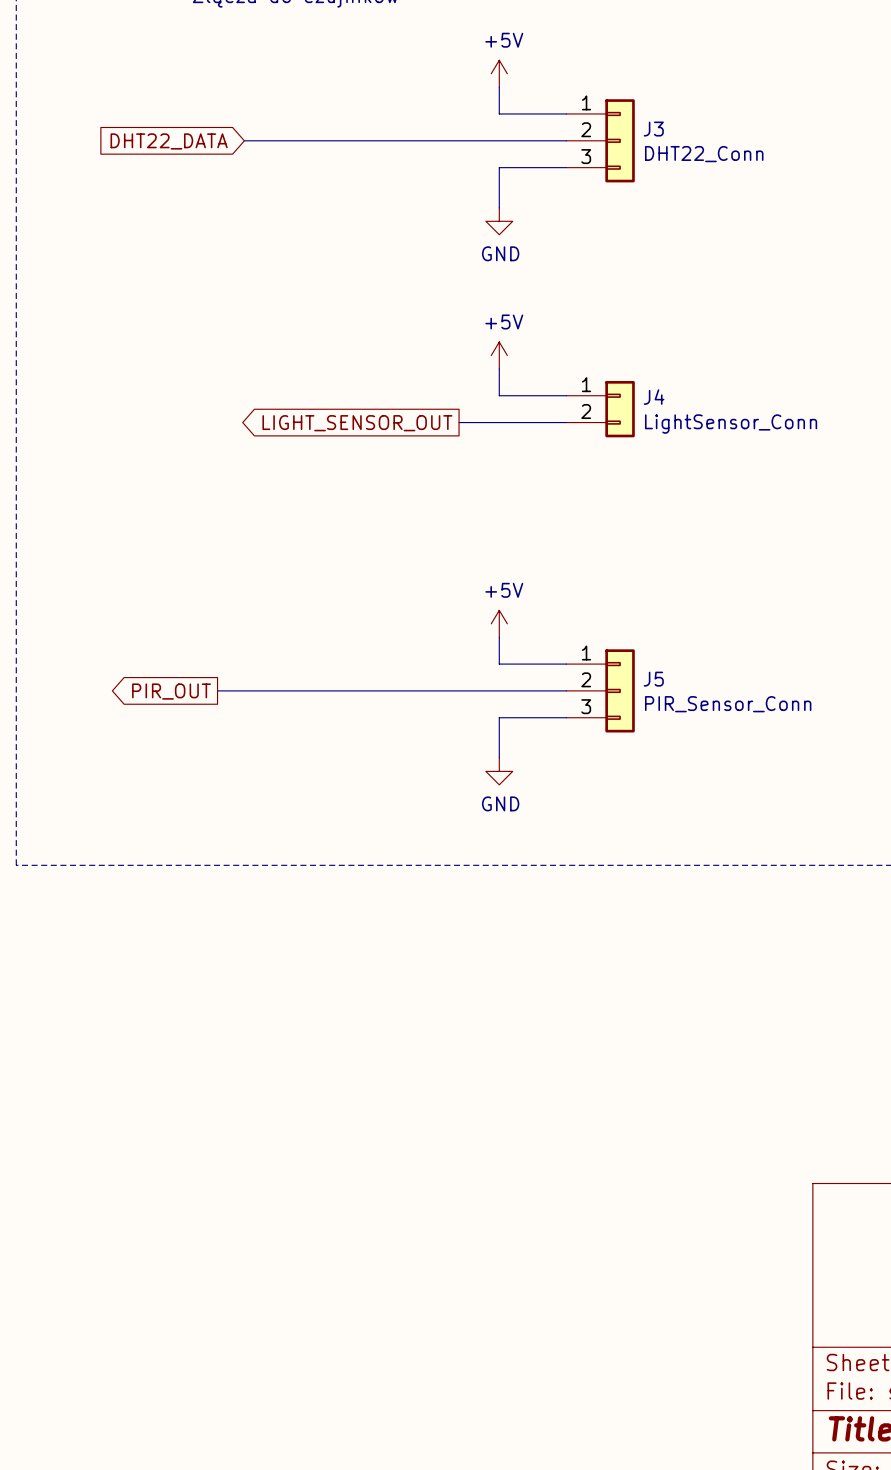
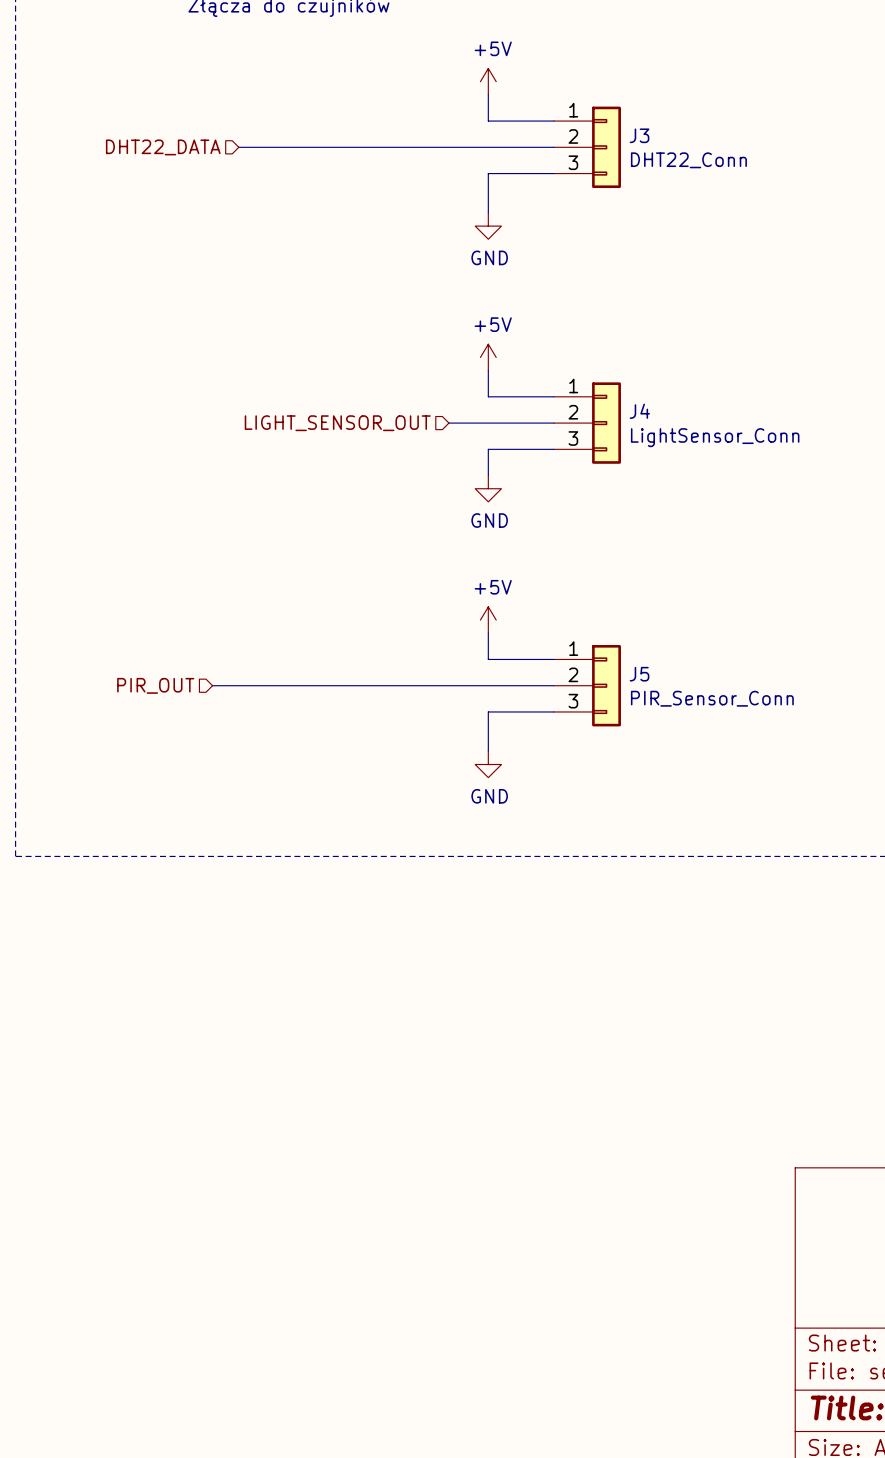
hierarchical label: none -> DHT22_DATA (163, 147)
global label: DHT22_DATA (169, 141) -> none
J4 symbol: [566, 380, 635, 438] -> [553, 382, 621, 464]
hierarchical label: none -> LIGHT_SENSOR_OUT (337, 423)
global label: LIGHT_SENSOR_OUT (357, 423) -> none
wire: none -> (553, 449) (488, 449) (488, 475)
power symbol: none -> GND (488, 488)
hierarchical label: none -> PIR_OUT (155, 685)
global label: PIR_OUT (171, 691) -> none

